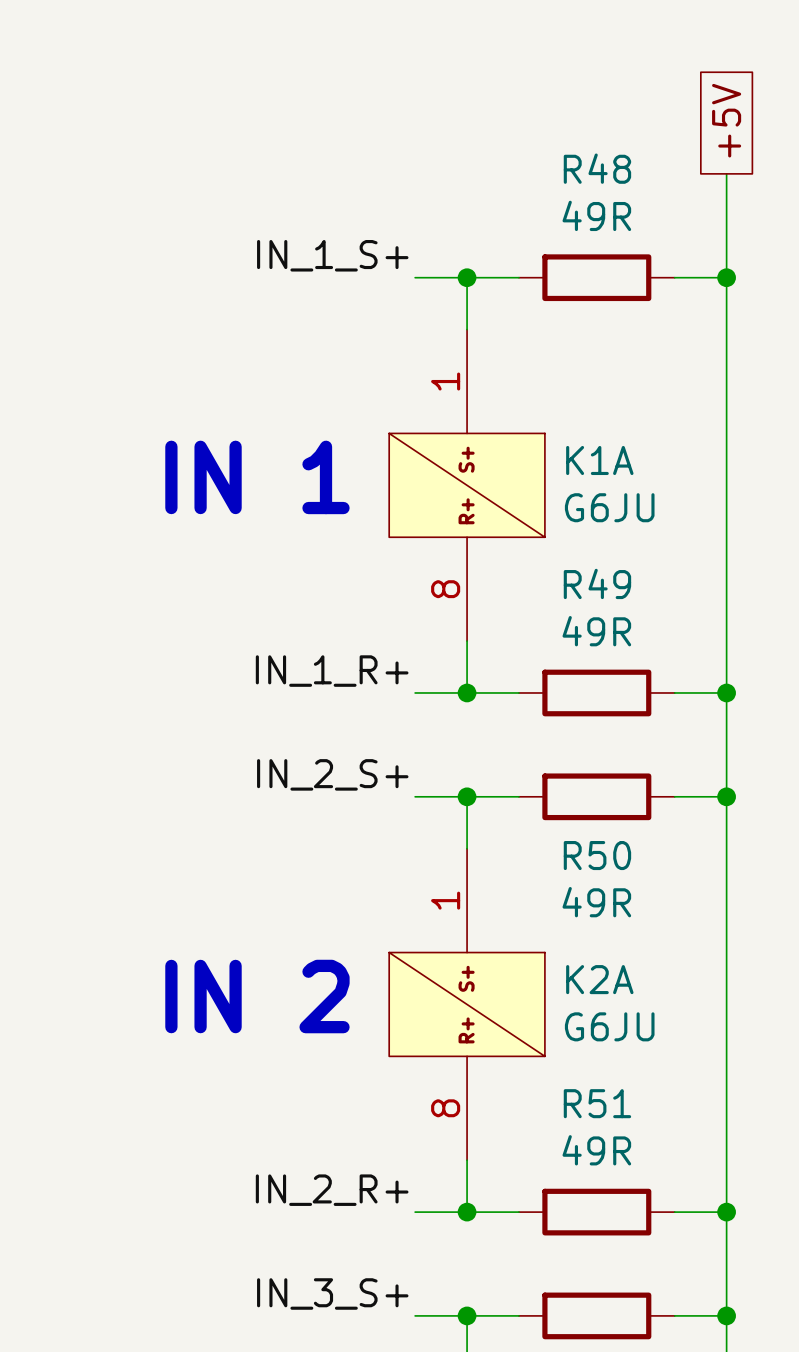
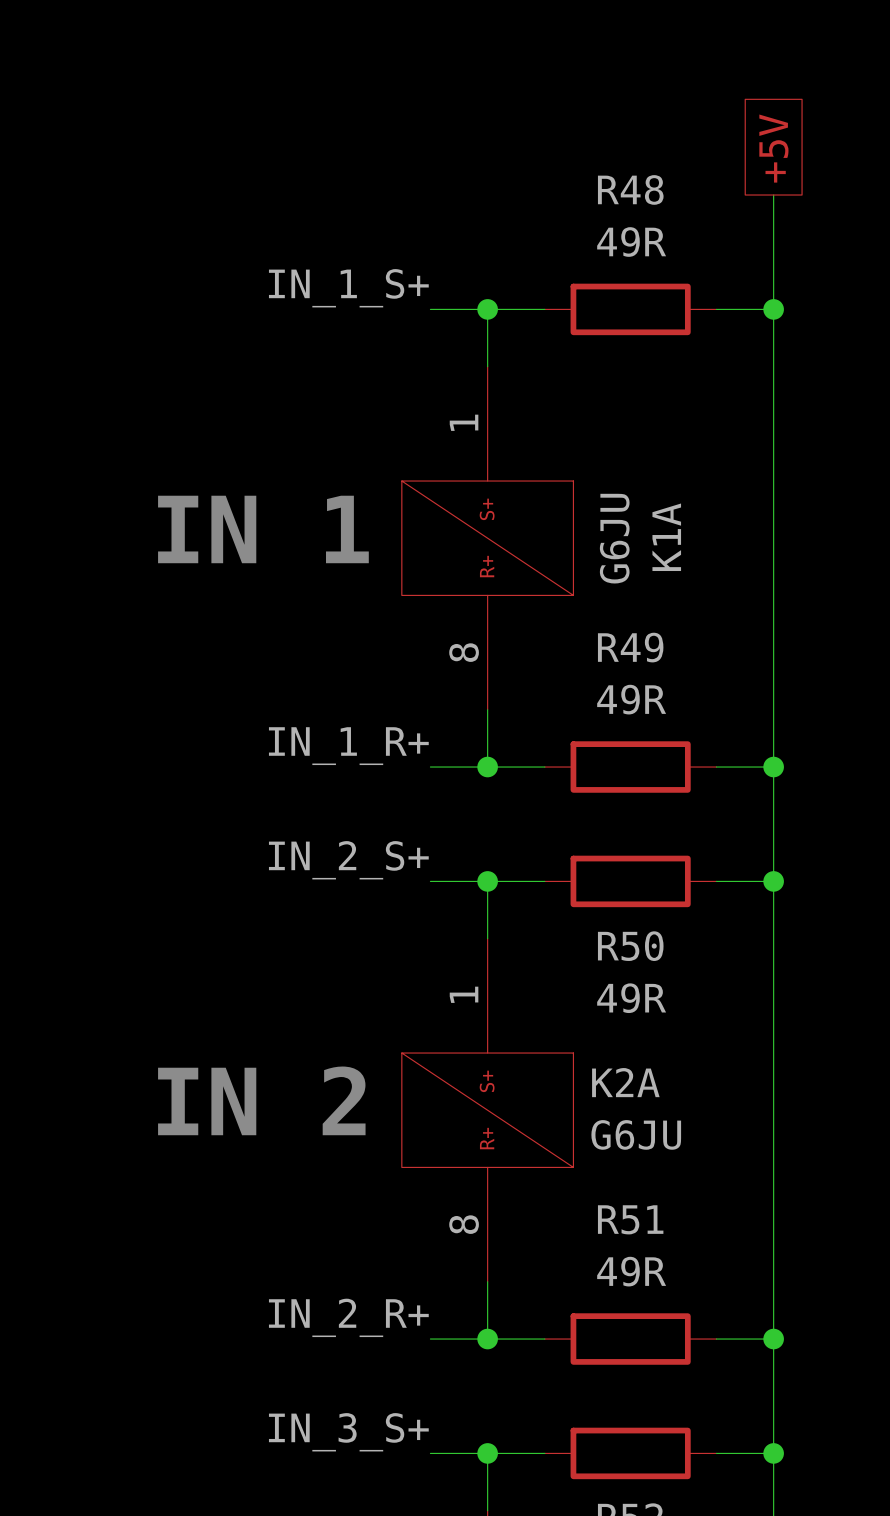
K1A name rotation: 0° (599, 460) -> 90° counterclockwise (666, 537)
K1A value rotation: 0° (609, 507) -> 90° counterclockwise (614, 538)

